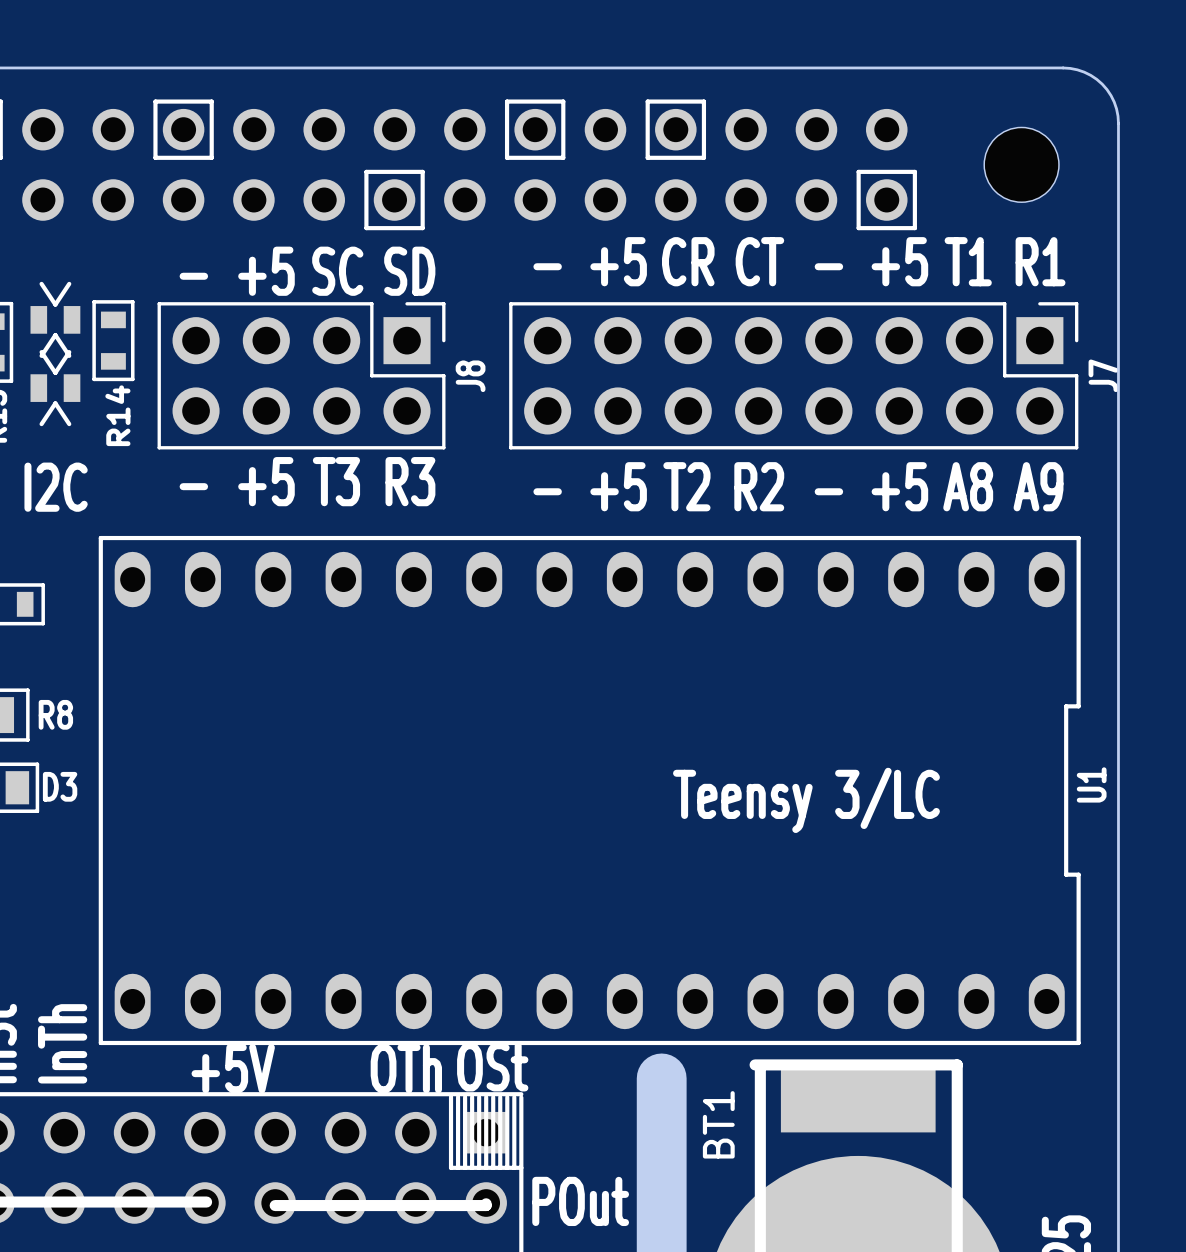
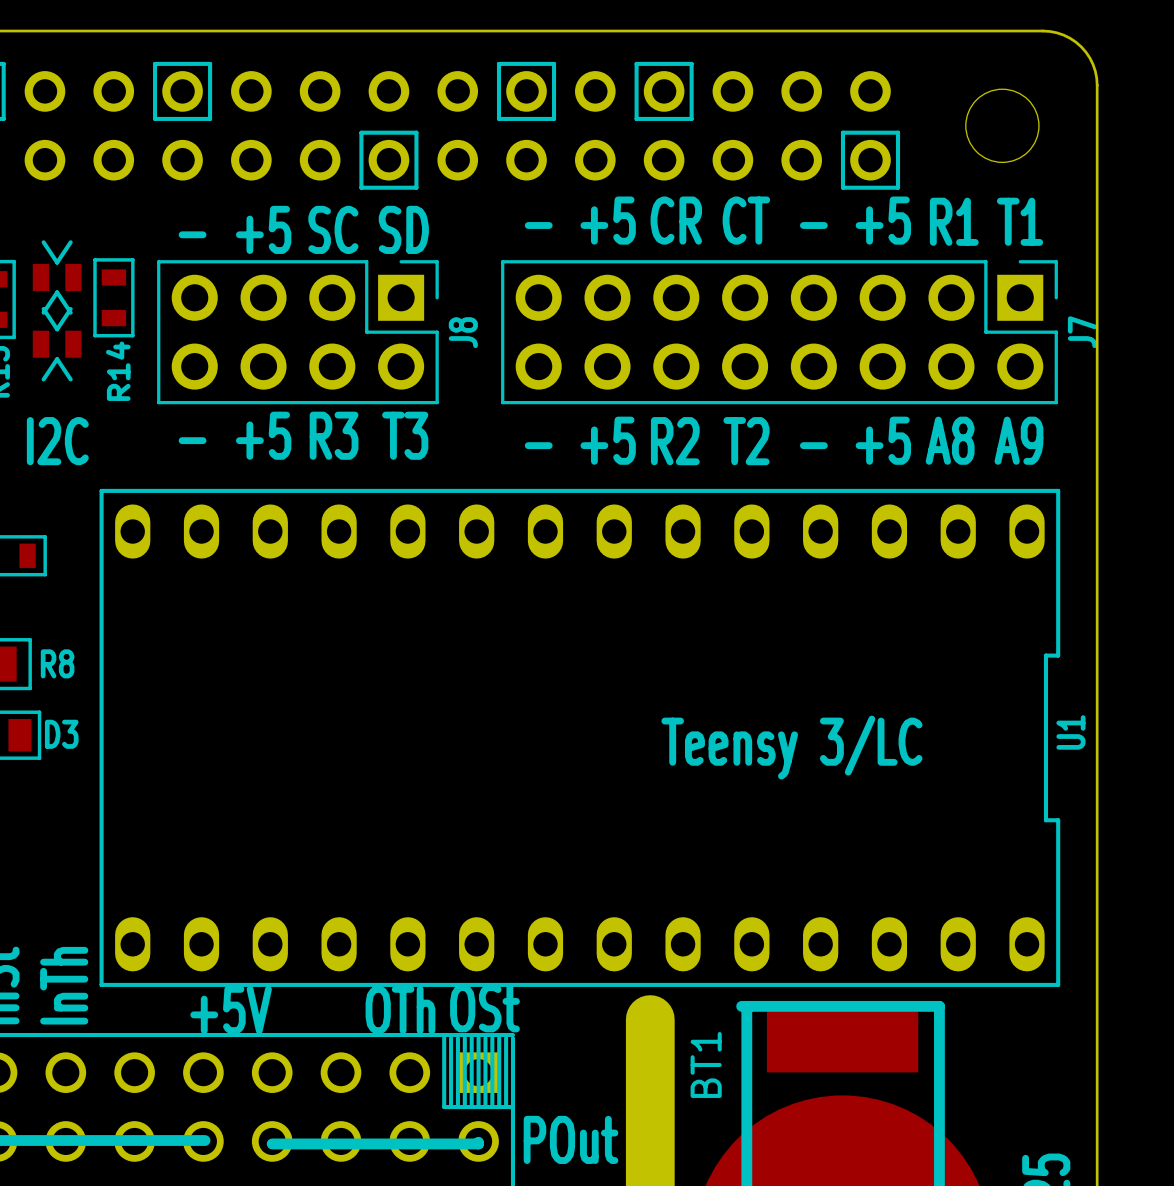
text: T1 (968, 261) -> R1 (954, 221)
text: R1 (1040, 261) -> T1 (1020, 221)
text: T3 (336, 481) -> R3 (334, 435)
text: R3 (410, 481) -> T3 (405, 435)
text: T2 (686, 486) -> R2 (675, 441)
text: R2 (759, 486) -> T2 (746, 441)

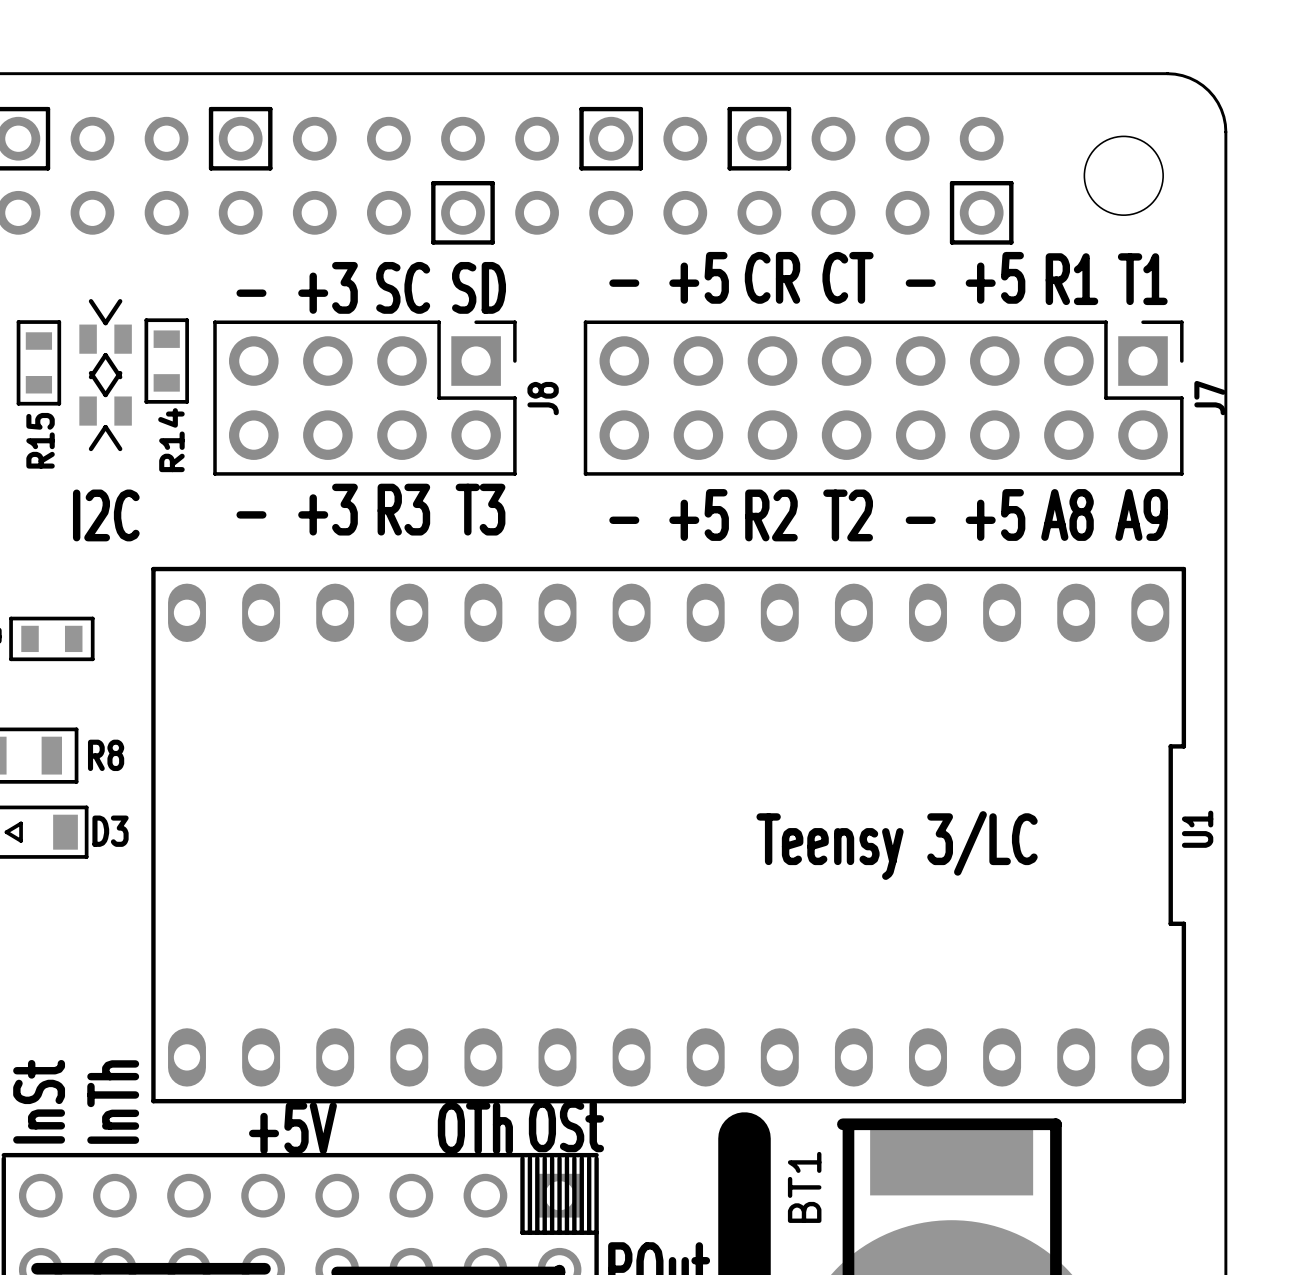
text: +5 (263, 229) -> +3 (328, 287)
text: +5 (263, 435) -> +3 (328, 509)

